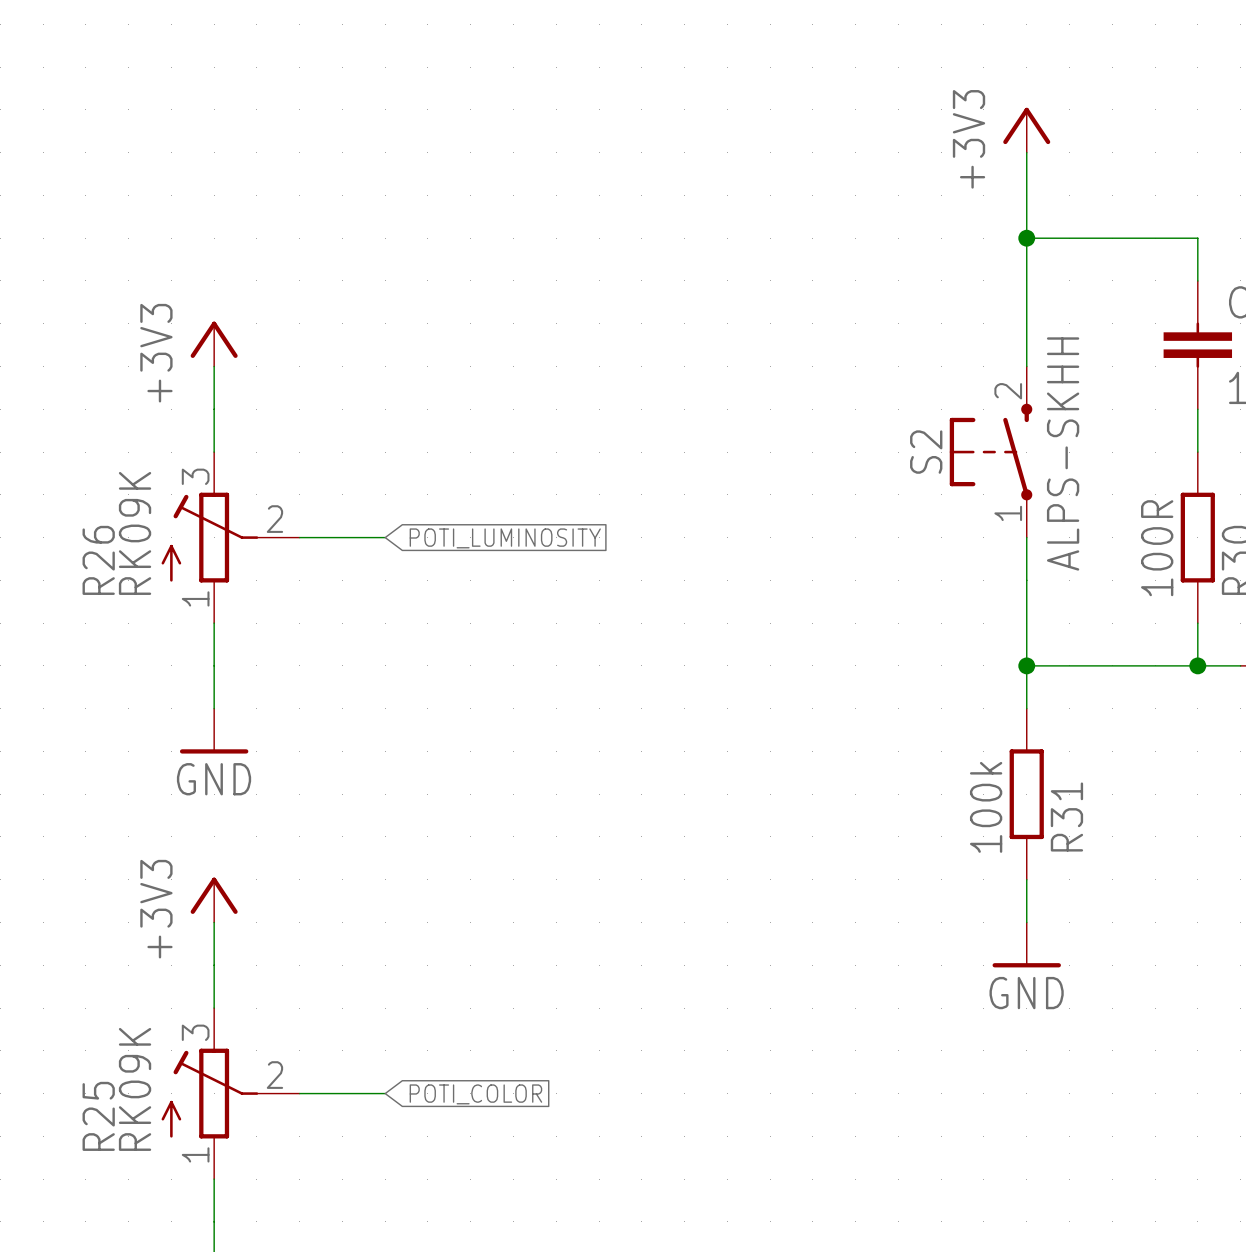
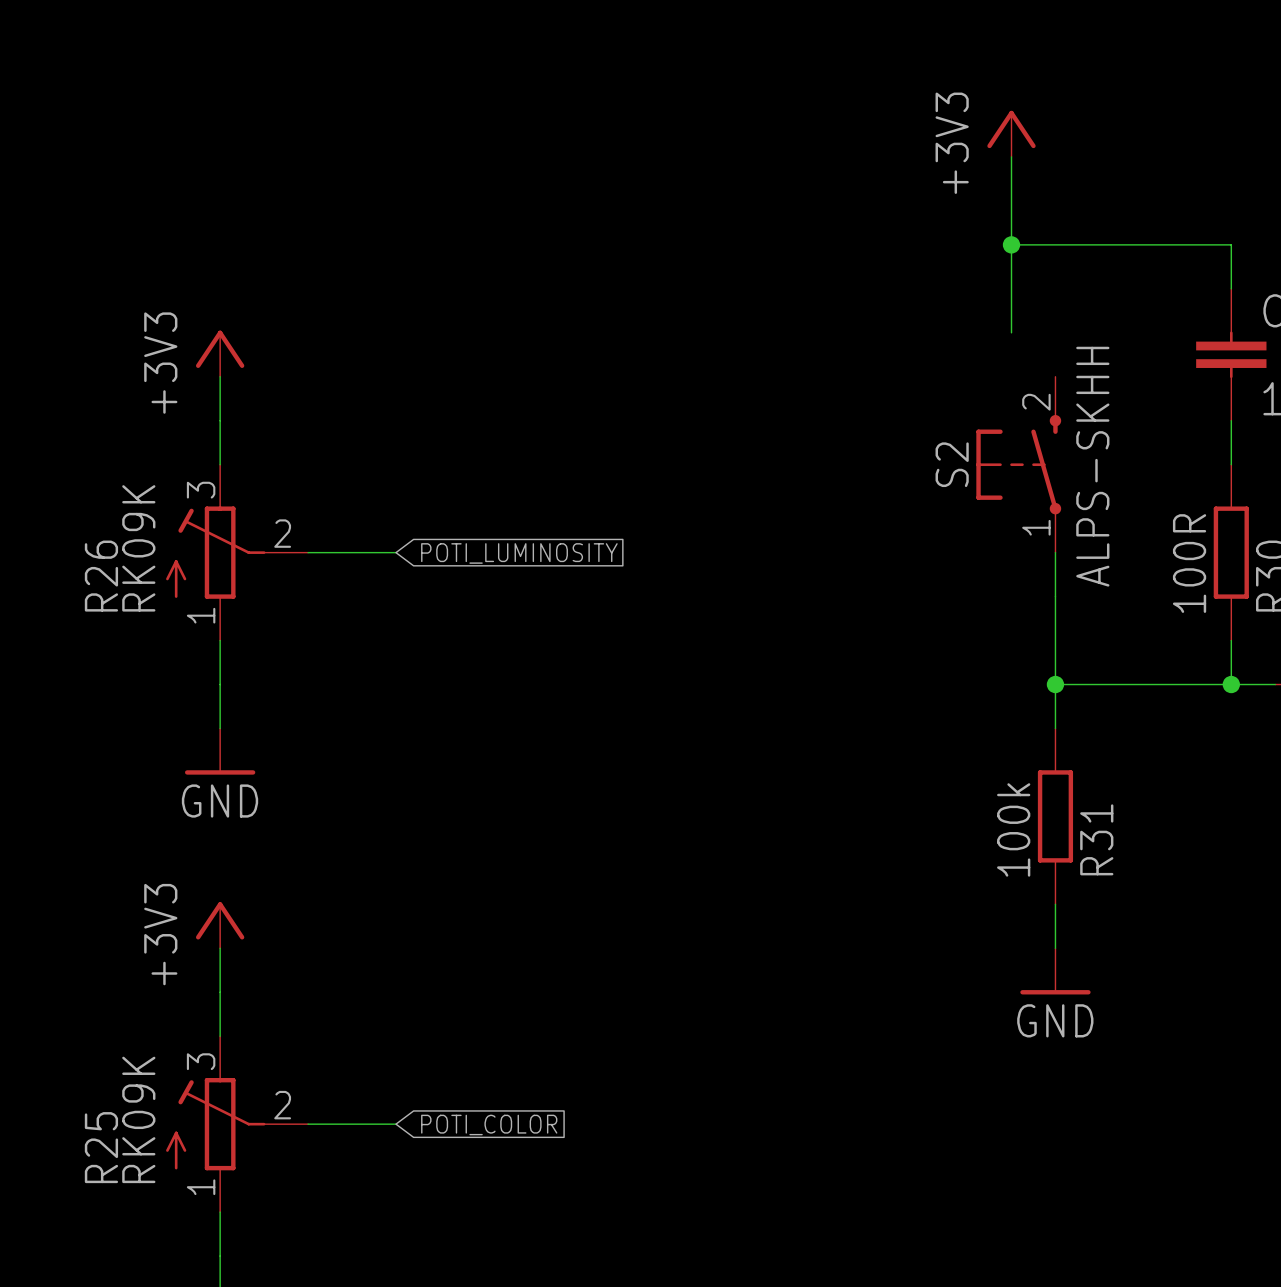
power symbol position: +3V3 (1026, 130) -> +3V3 (1011, 133)
wire: none -> (1011, 156) (1011, 332)
wire: (1026, 152) (1026, 366) -> none
wire: none -> (1011, 244) (1055, 244)
junction position: (1026, 238) -> (1011, 244)

